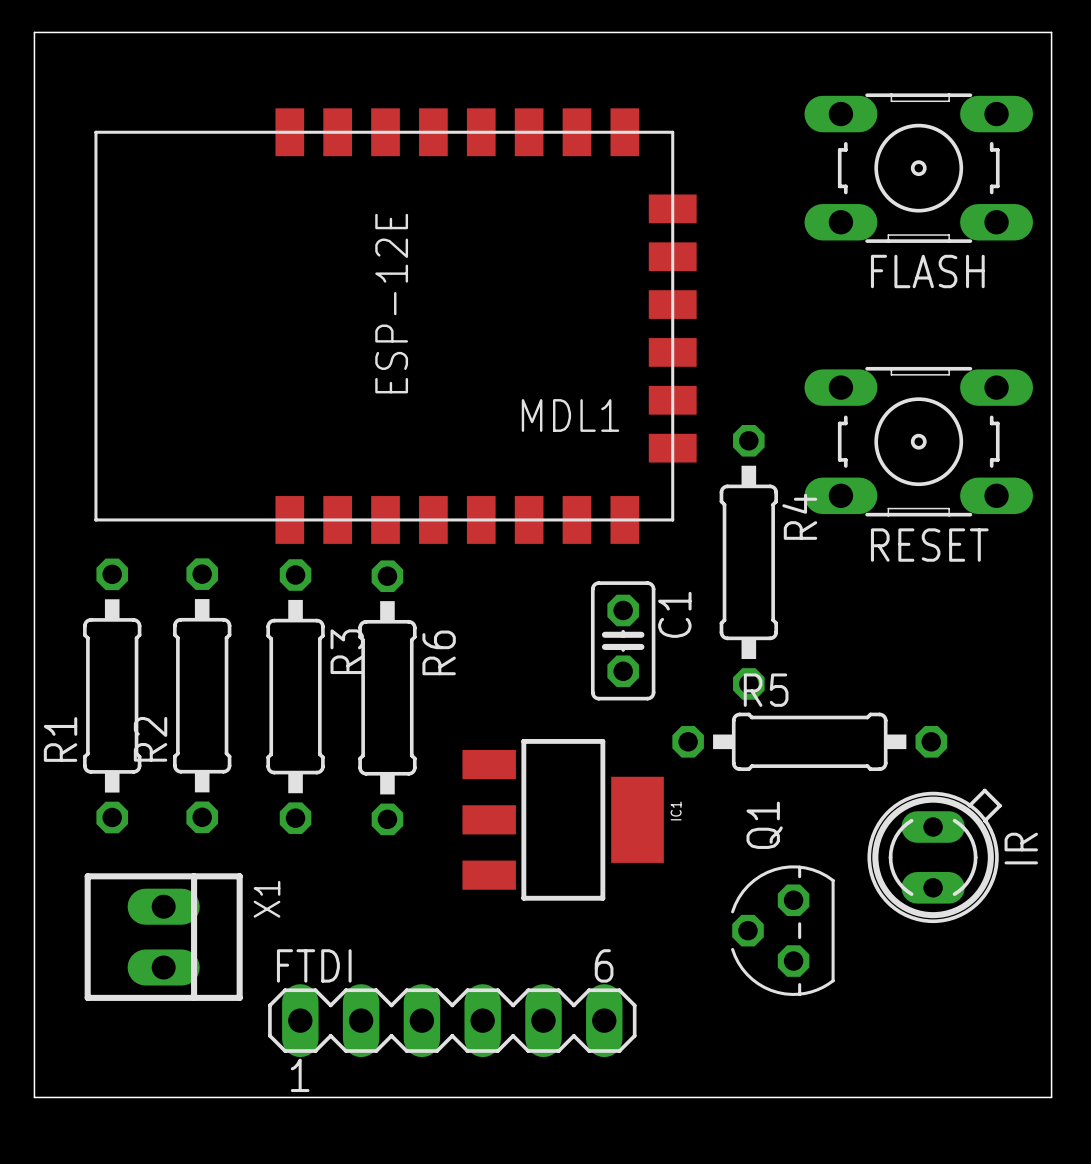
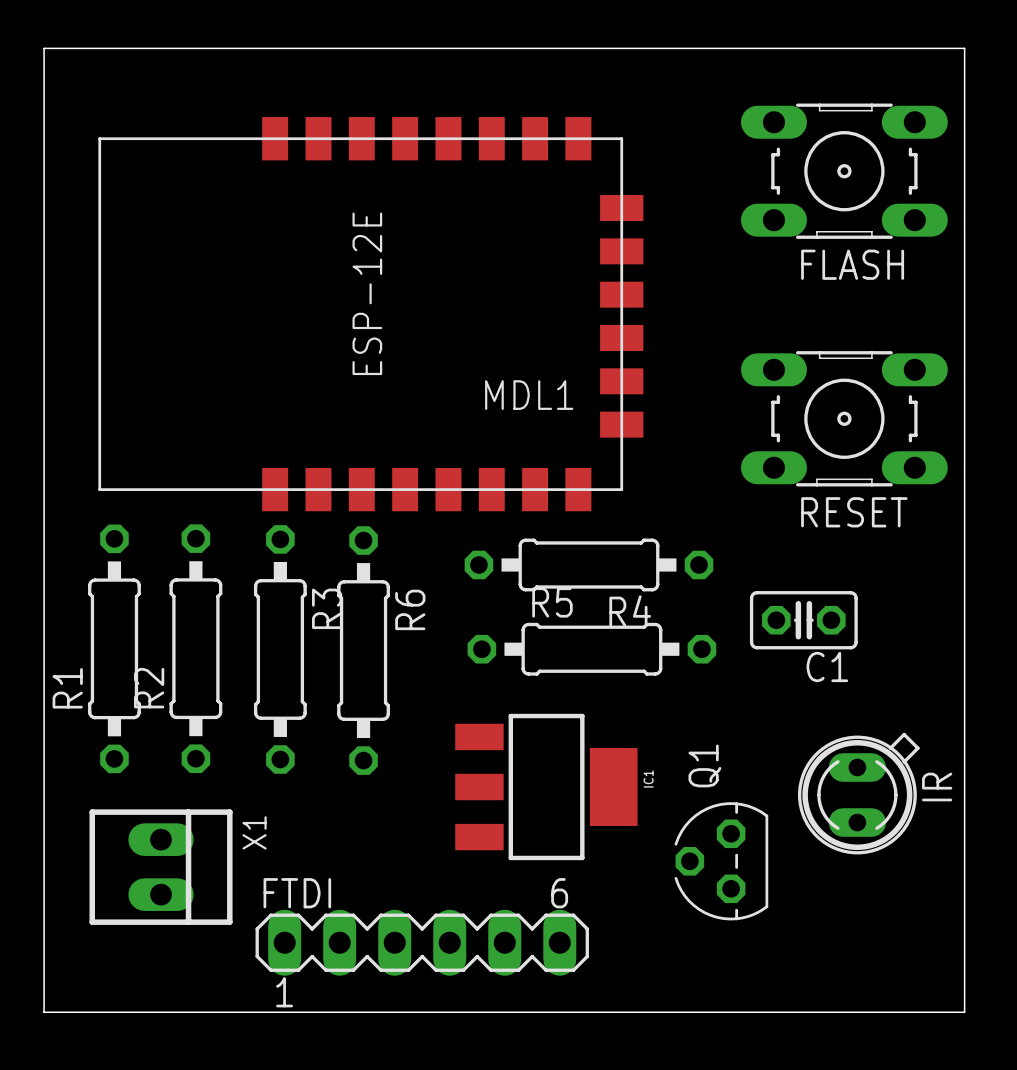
R4 rotation: 0° (748, 562) -> 90° clockwise (588, 564)
C1 rotation: 0° (623, 640) -> 90° clockwise (803, 620)
C1 position: (623, 640) -> (803, 620)
R5 position: (809, 741) -> (591, 649)
IC1 position: (563, 819) -> (546, 787)

